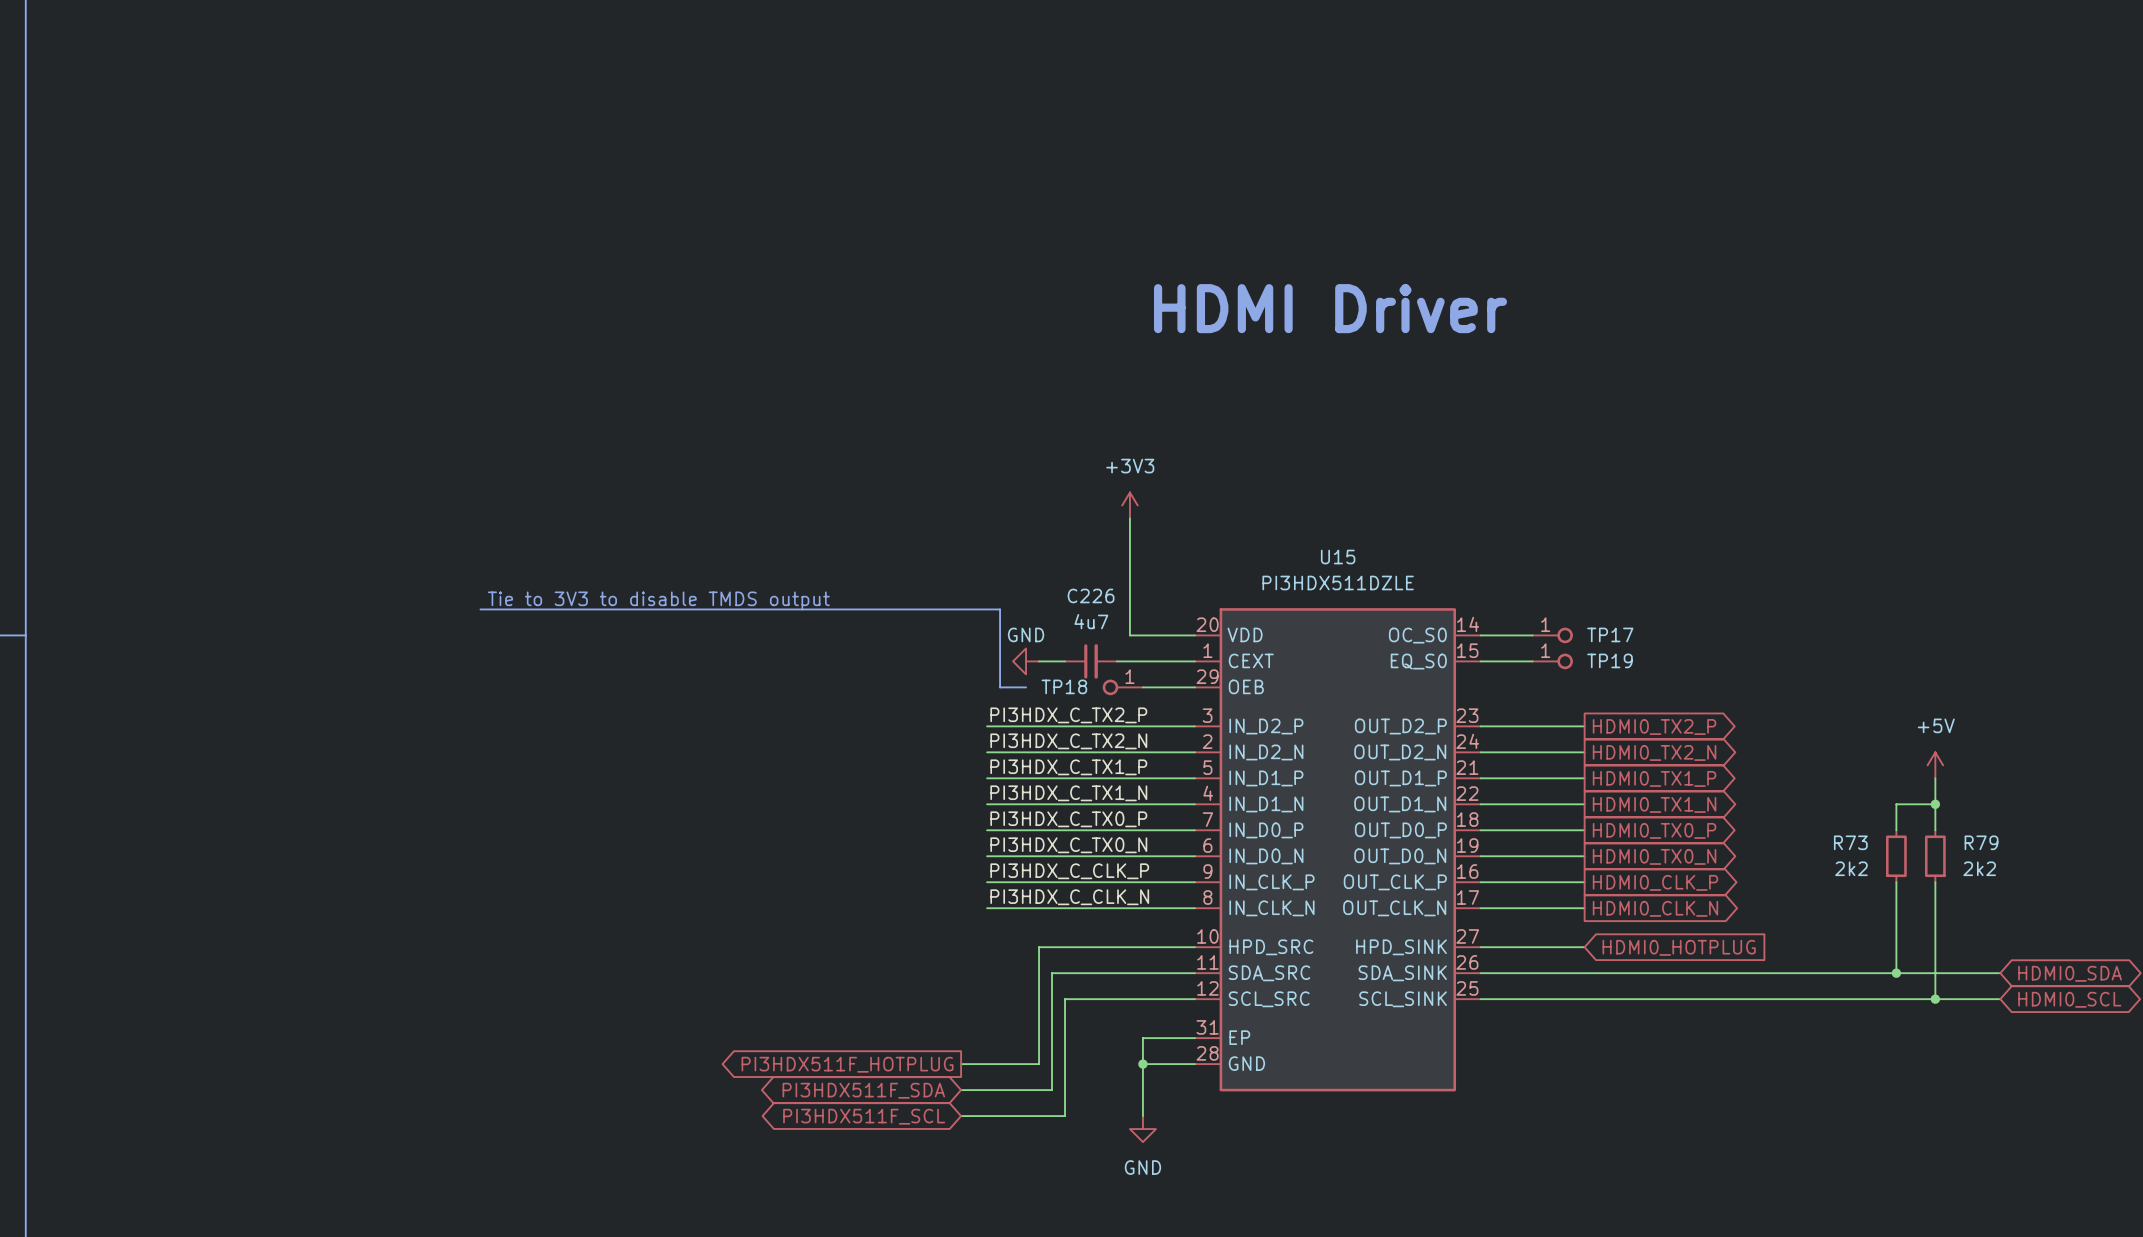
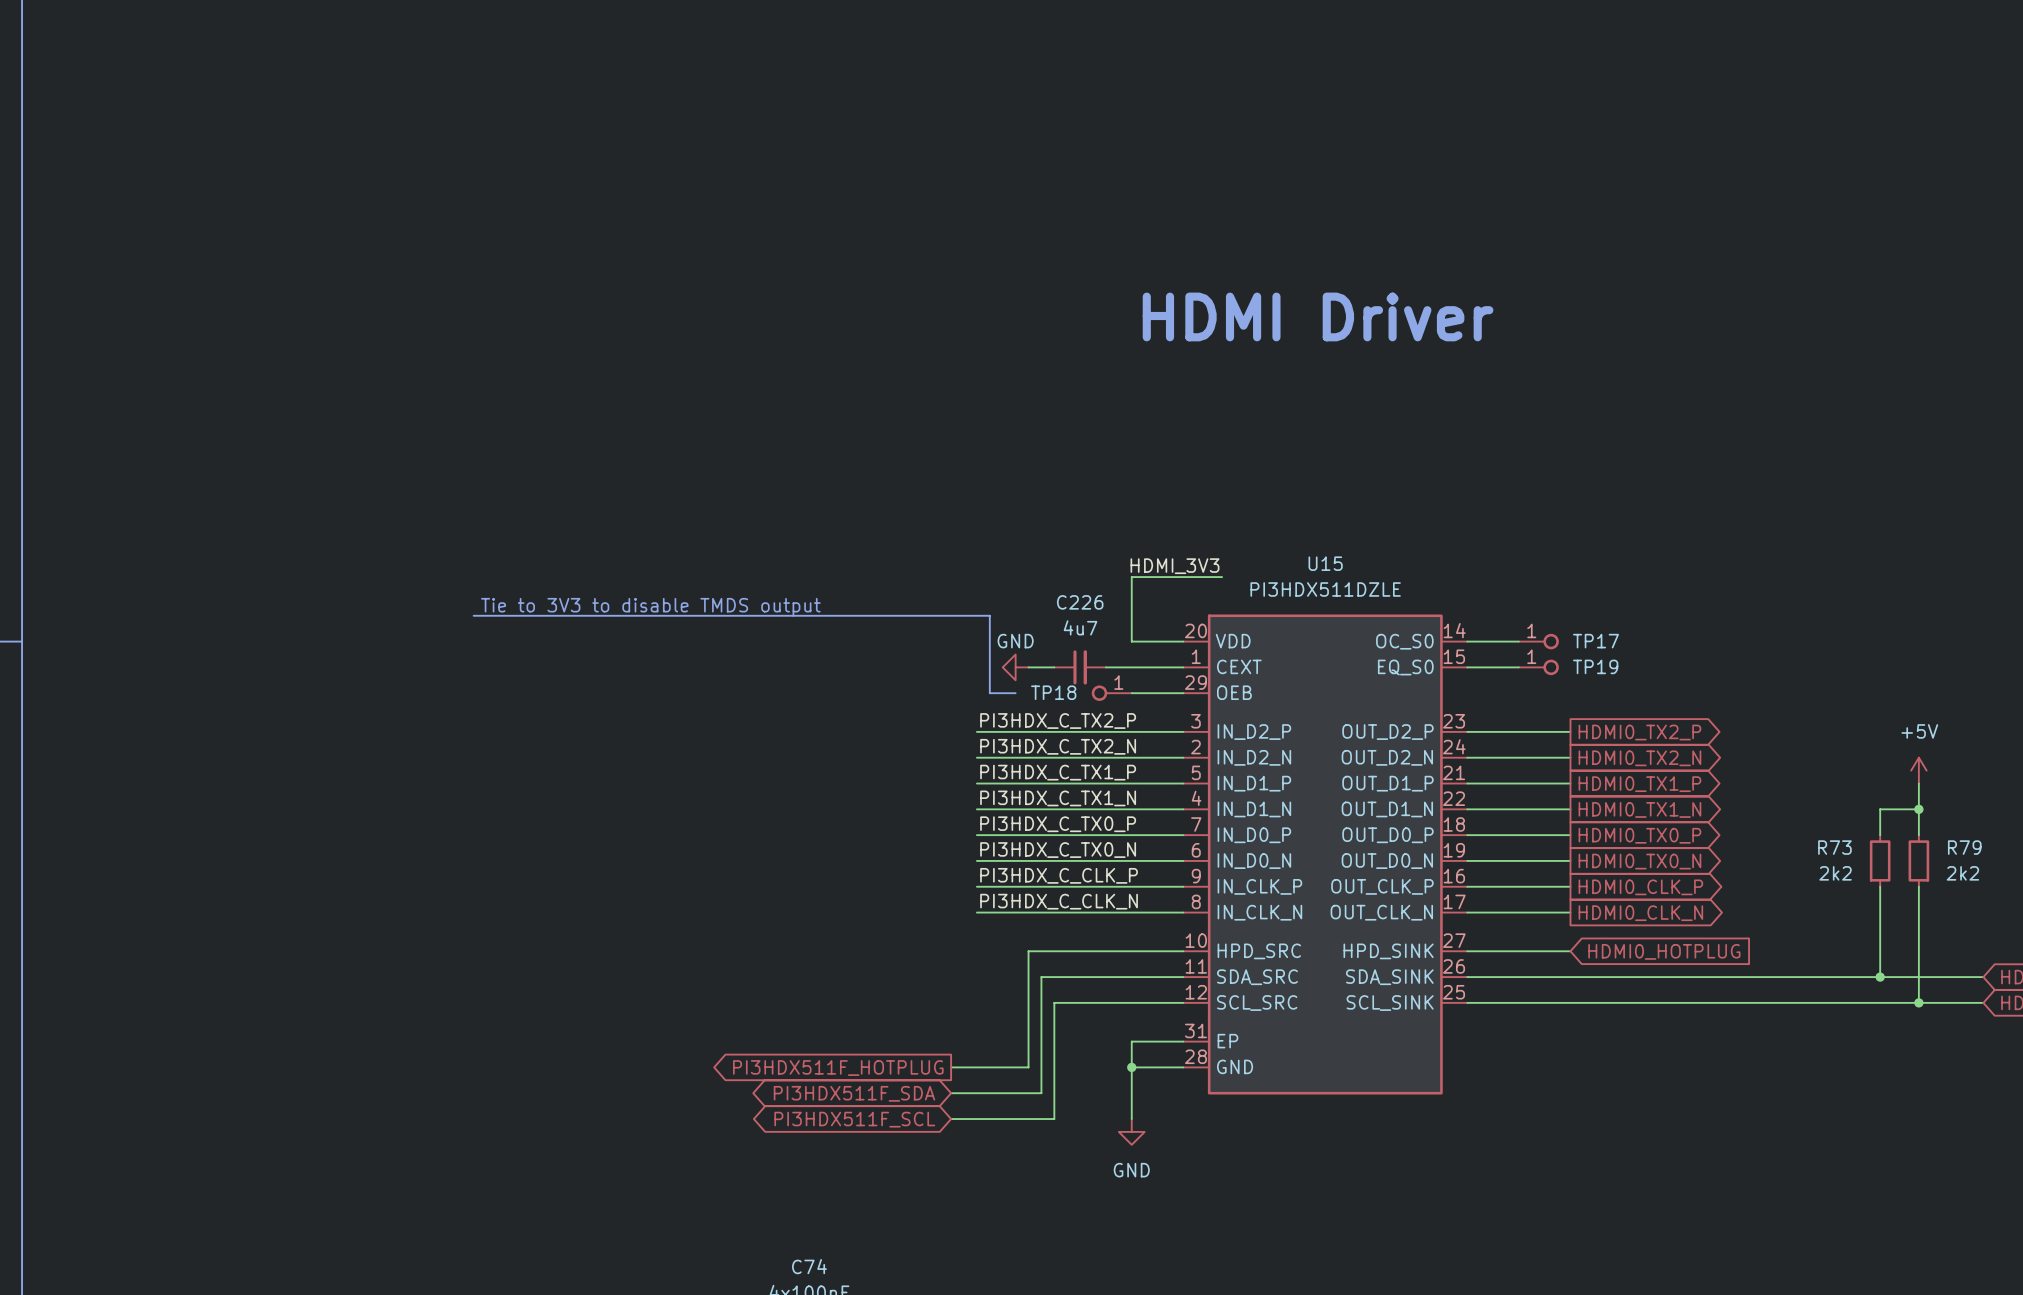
power symbol: +3V3 (1129, 505) -> none
wire: (1129, 518) (1129, 635) (1142, 635) -> (1222, 577) (1131, 577) (1131, 641)
label: none -> HDMI_3V3 (1174, 566)

